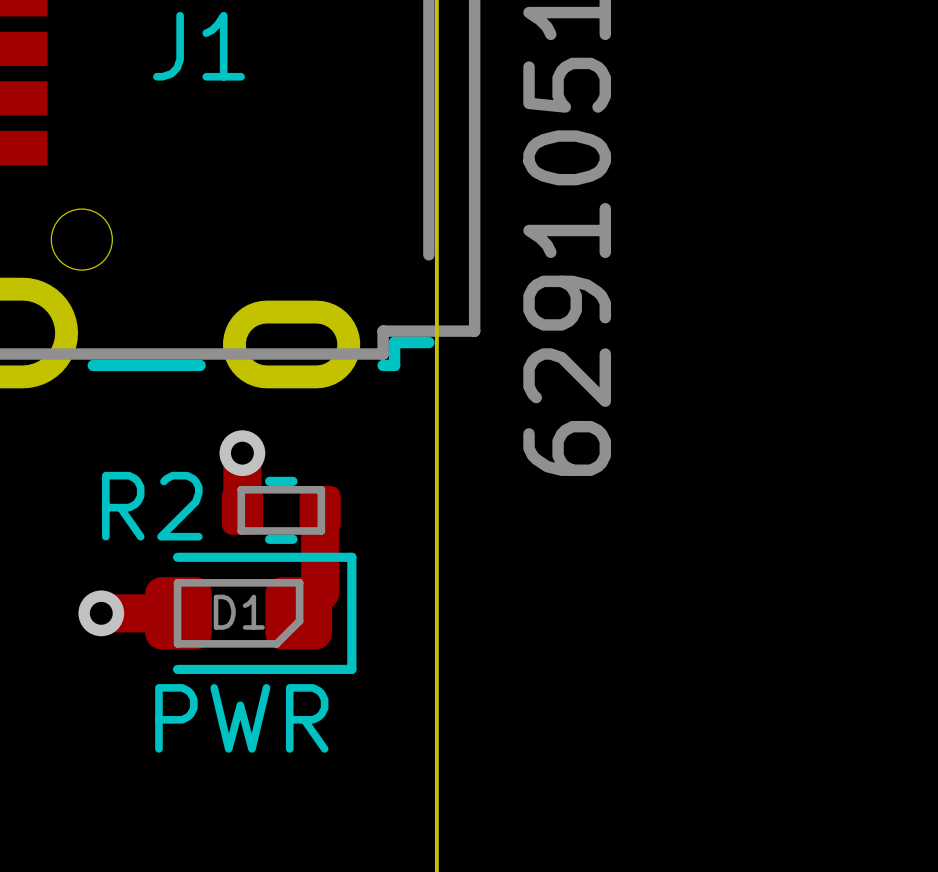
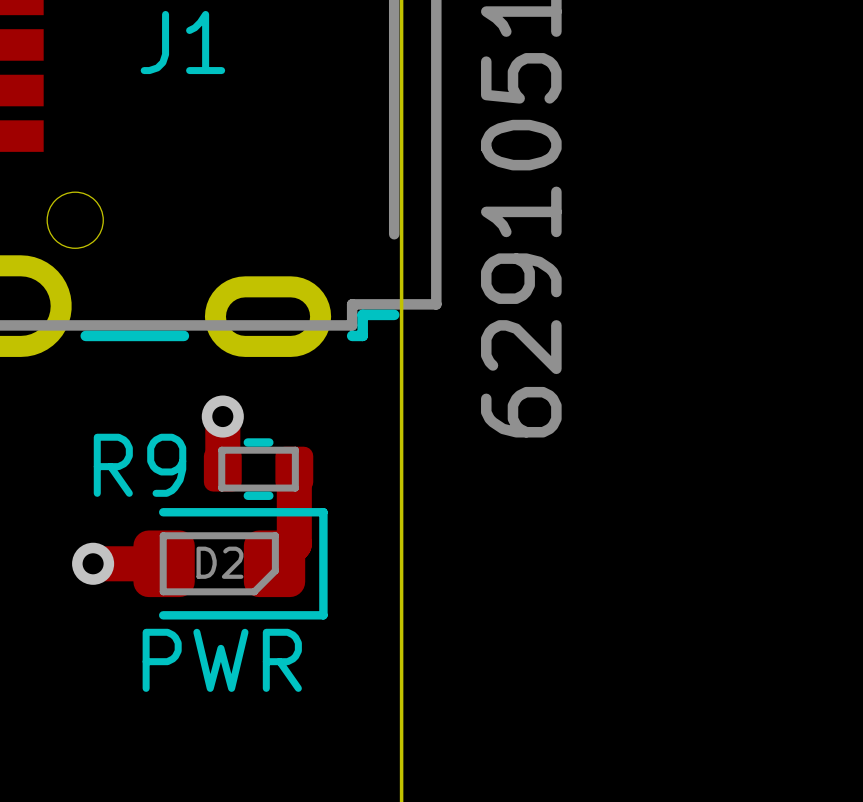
R2 name: R2 (152, 506) -> R9 (140, 465)
D1 name: D1 (239, 612) -> D2 (219, 562)

